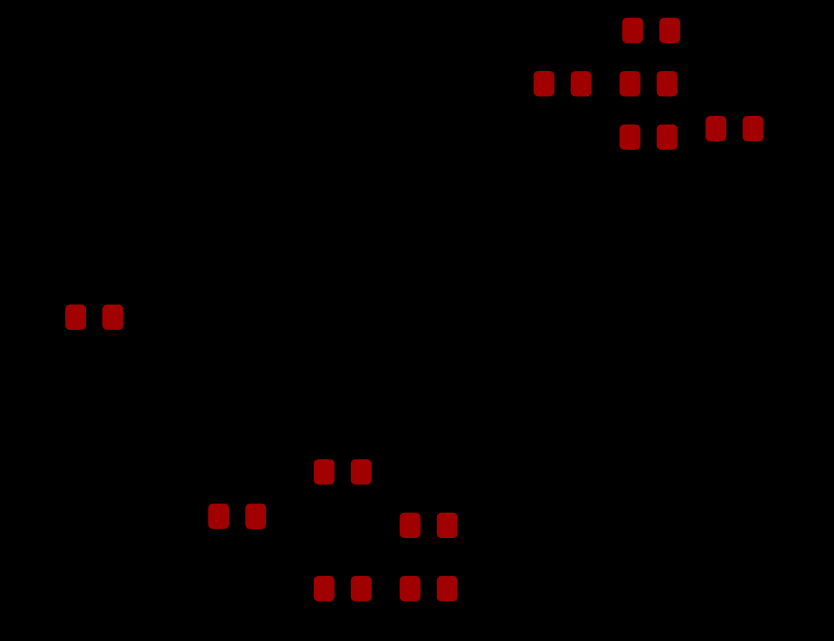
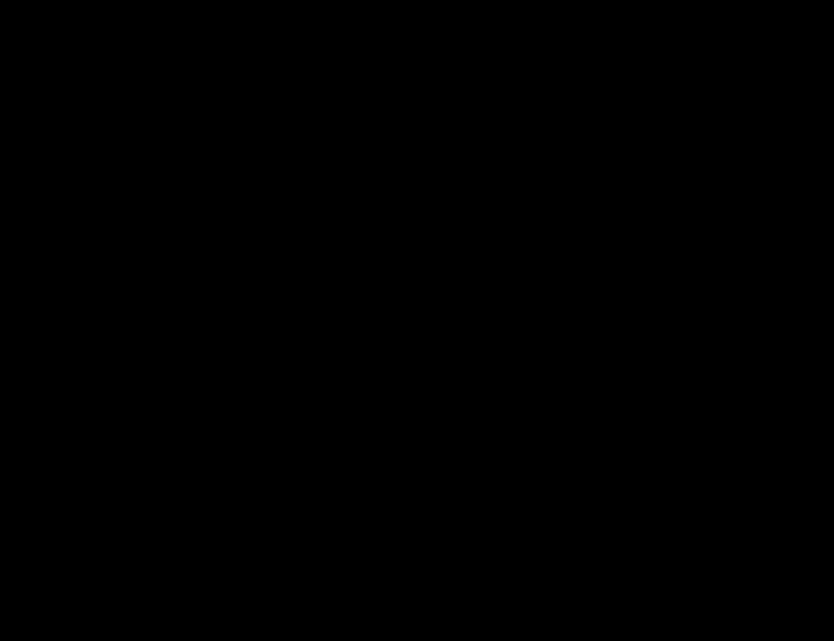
part: (651, 30) -> none
part: (562, 83) -> none
part: (648, 83) -> none
part: (734, 128) -> none
part: (648, 137) -> none
part: (94, 317) -> none
part: (342, 471) -> none
part: (237, 516) -> none
part: (428, 525) -> none
part: (342, 588) -> none
part: (428, 588) -> none

